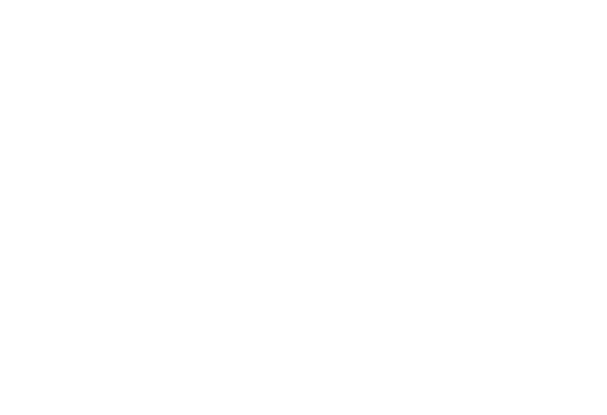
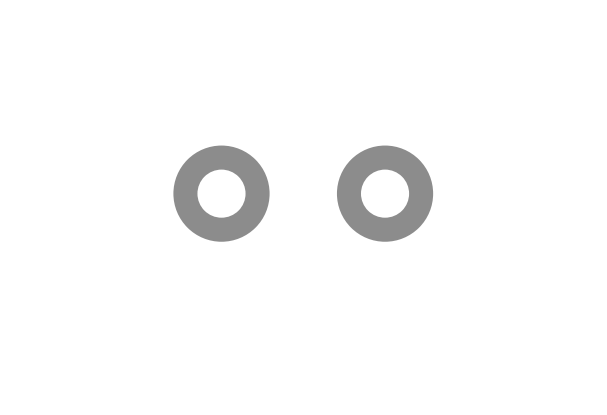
part: none -> (303, 193)

